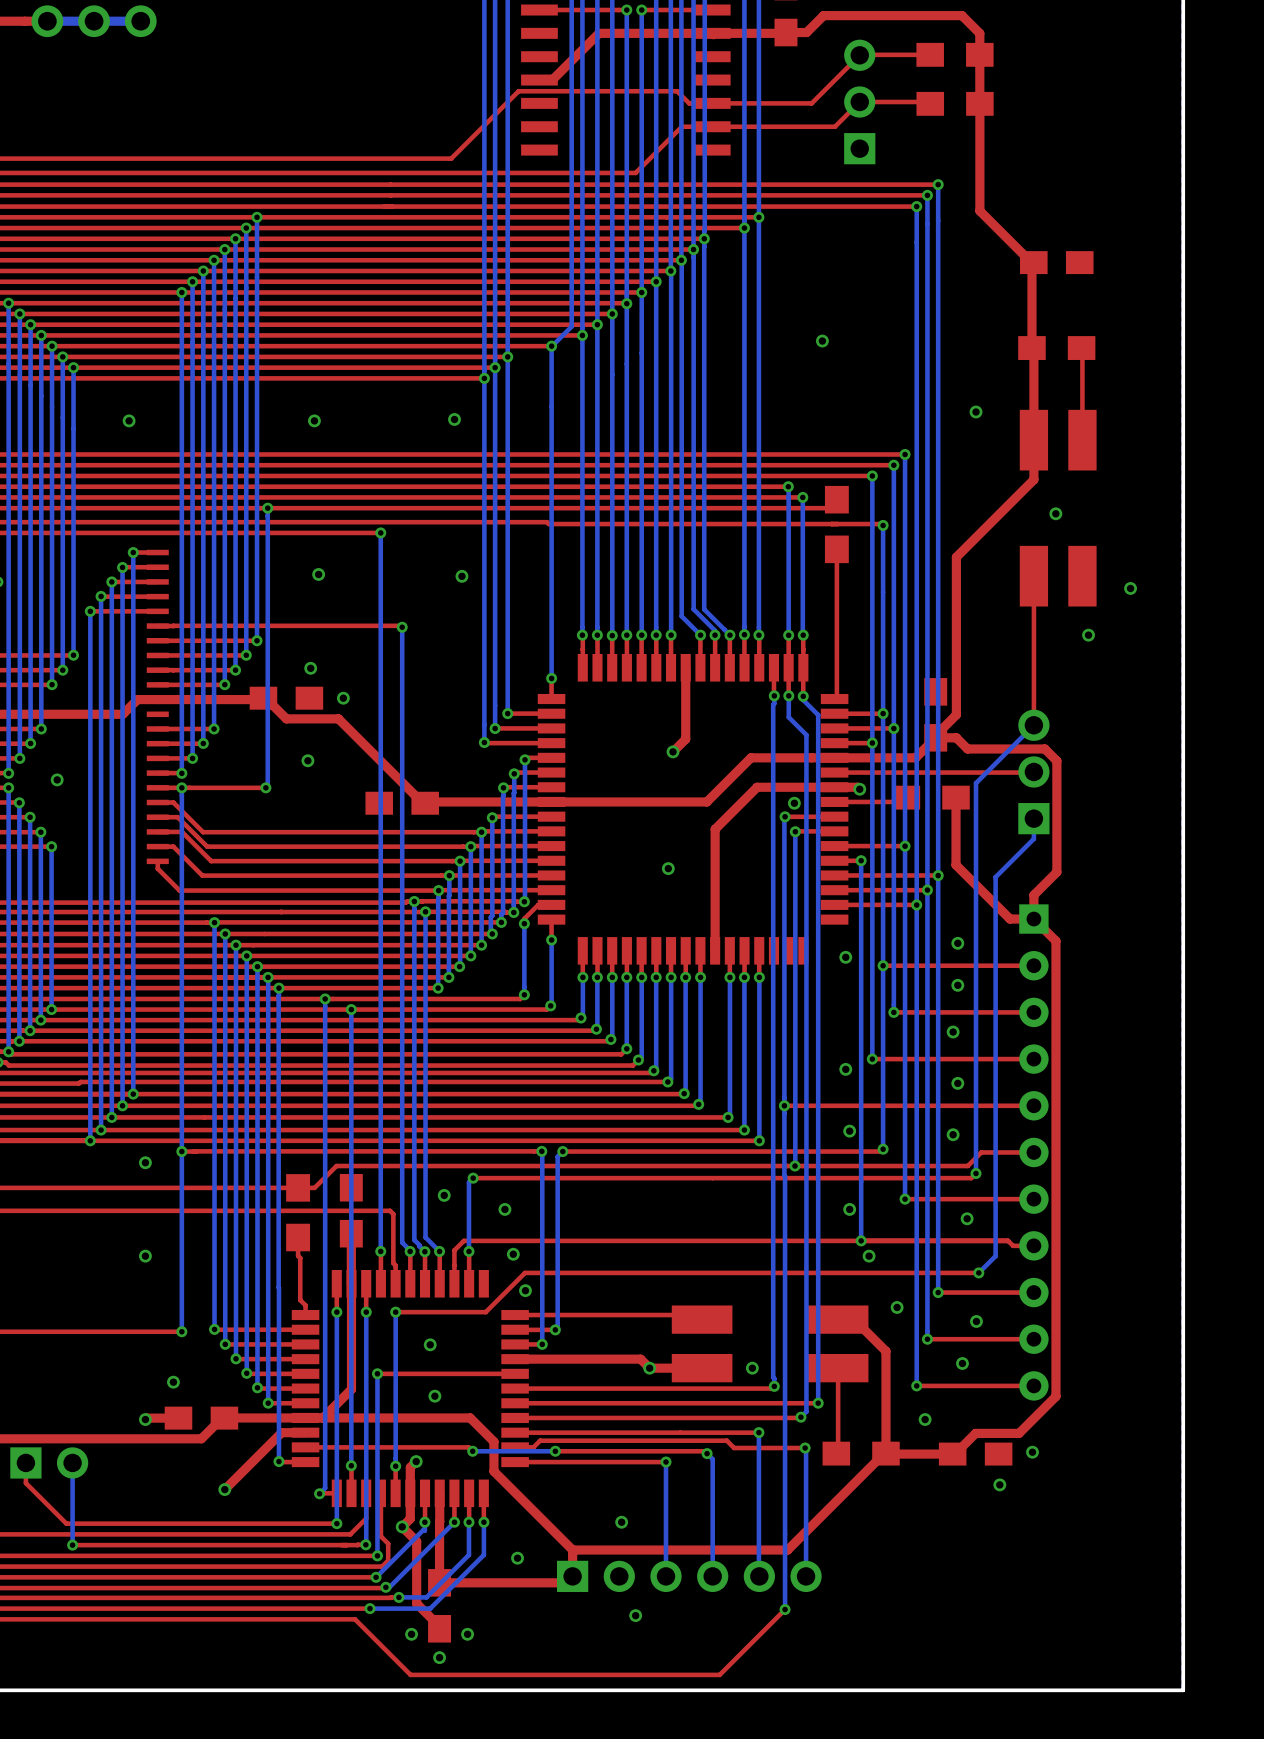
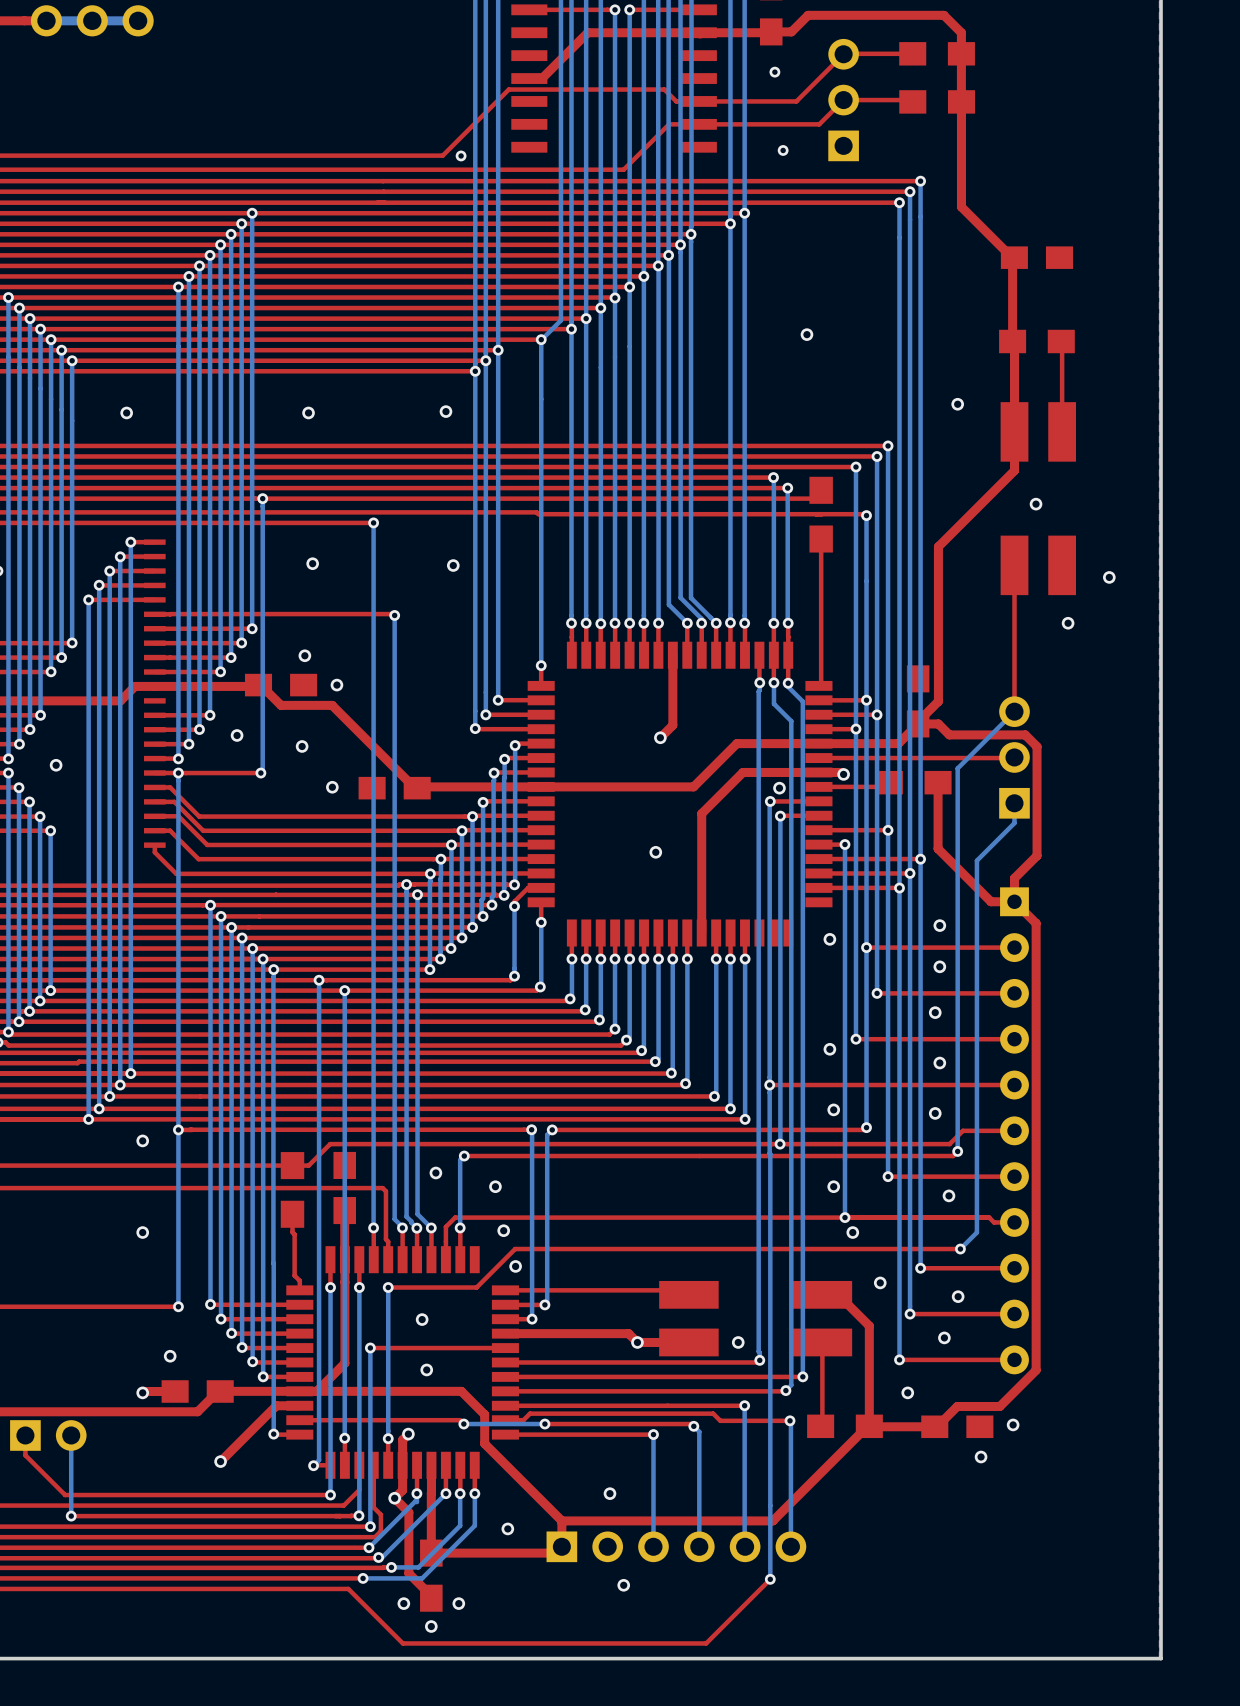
via: none -> (774, 72)
via: none -> (783, 150)
via: none -> (461, 155)
via: none -> (237, 735)
via: none -> (332, 787)

